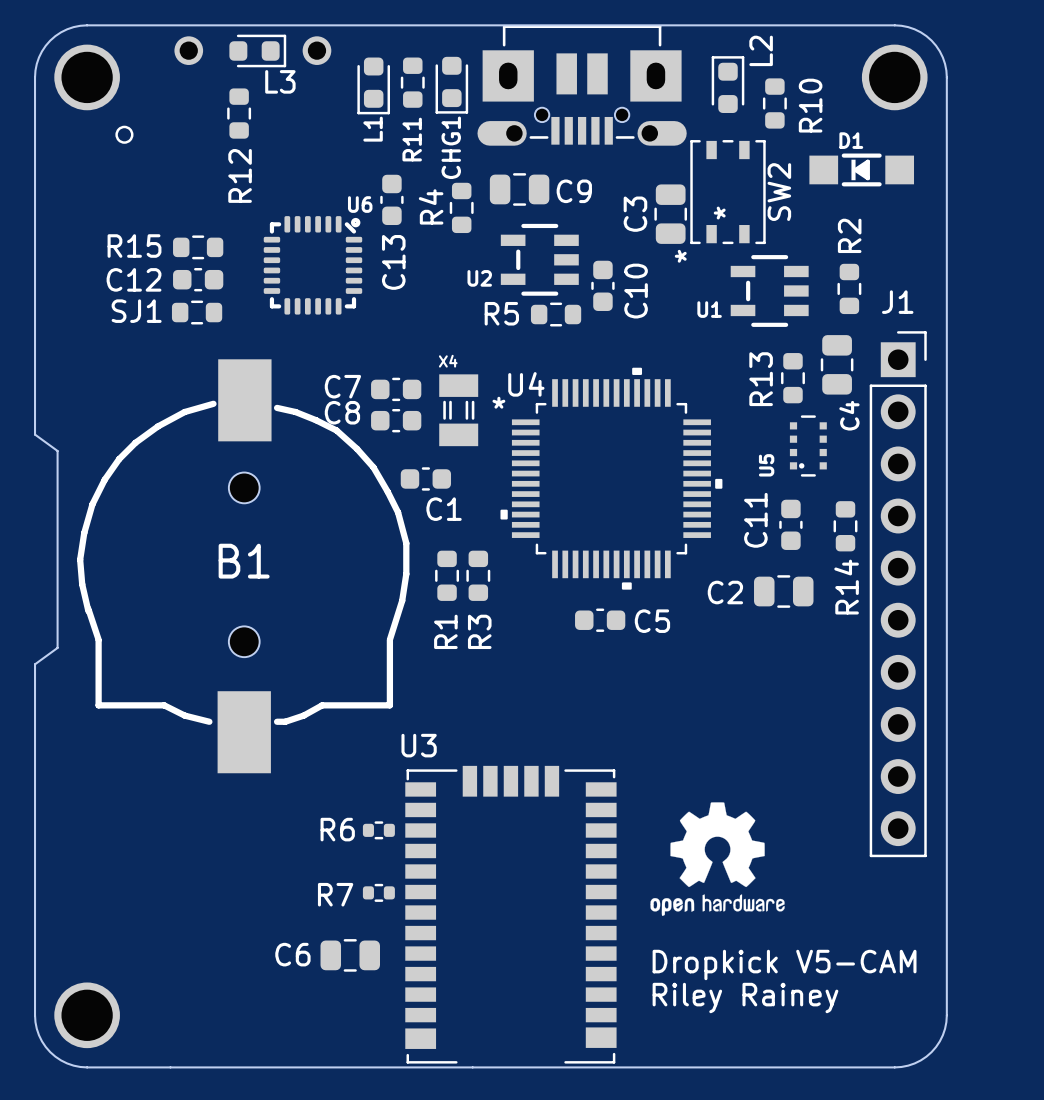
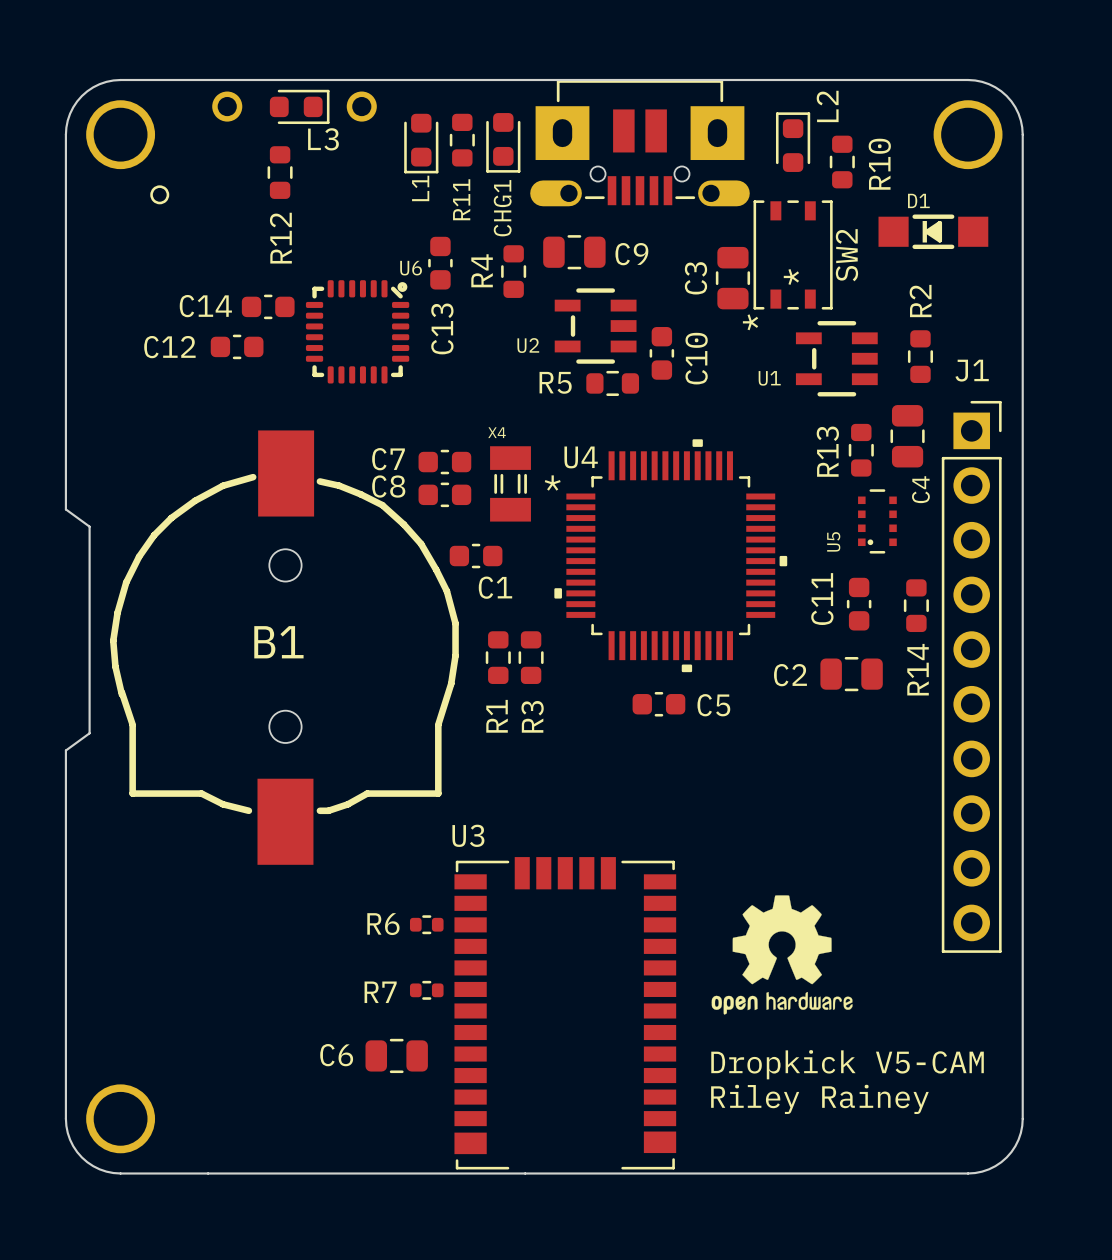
C14: none -> (268, 306)
R15: (198, 247) -> none
SJ1: (197, 312) -> none

